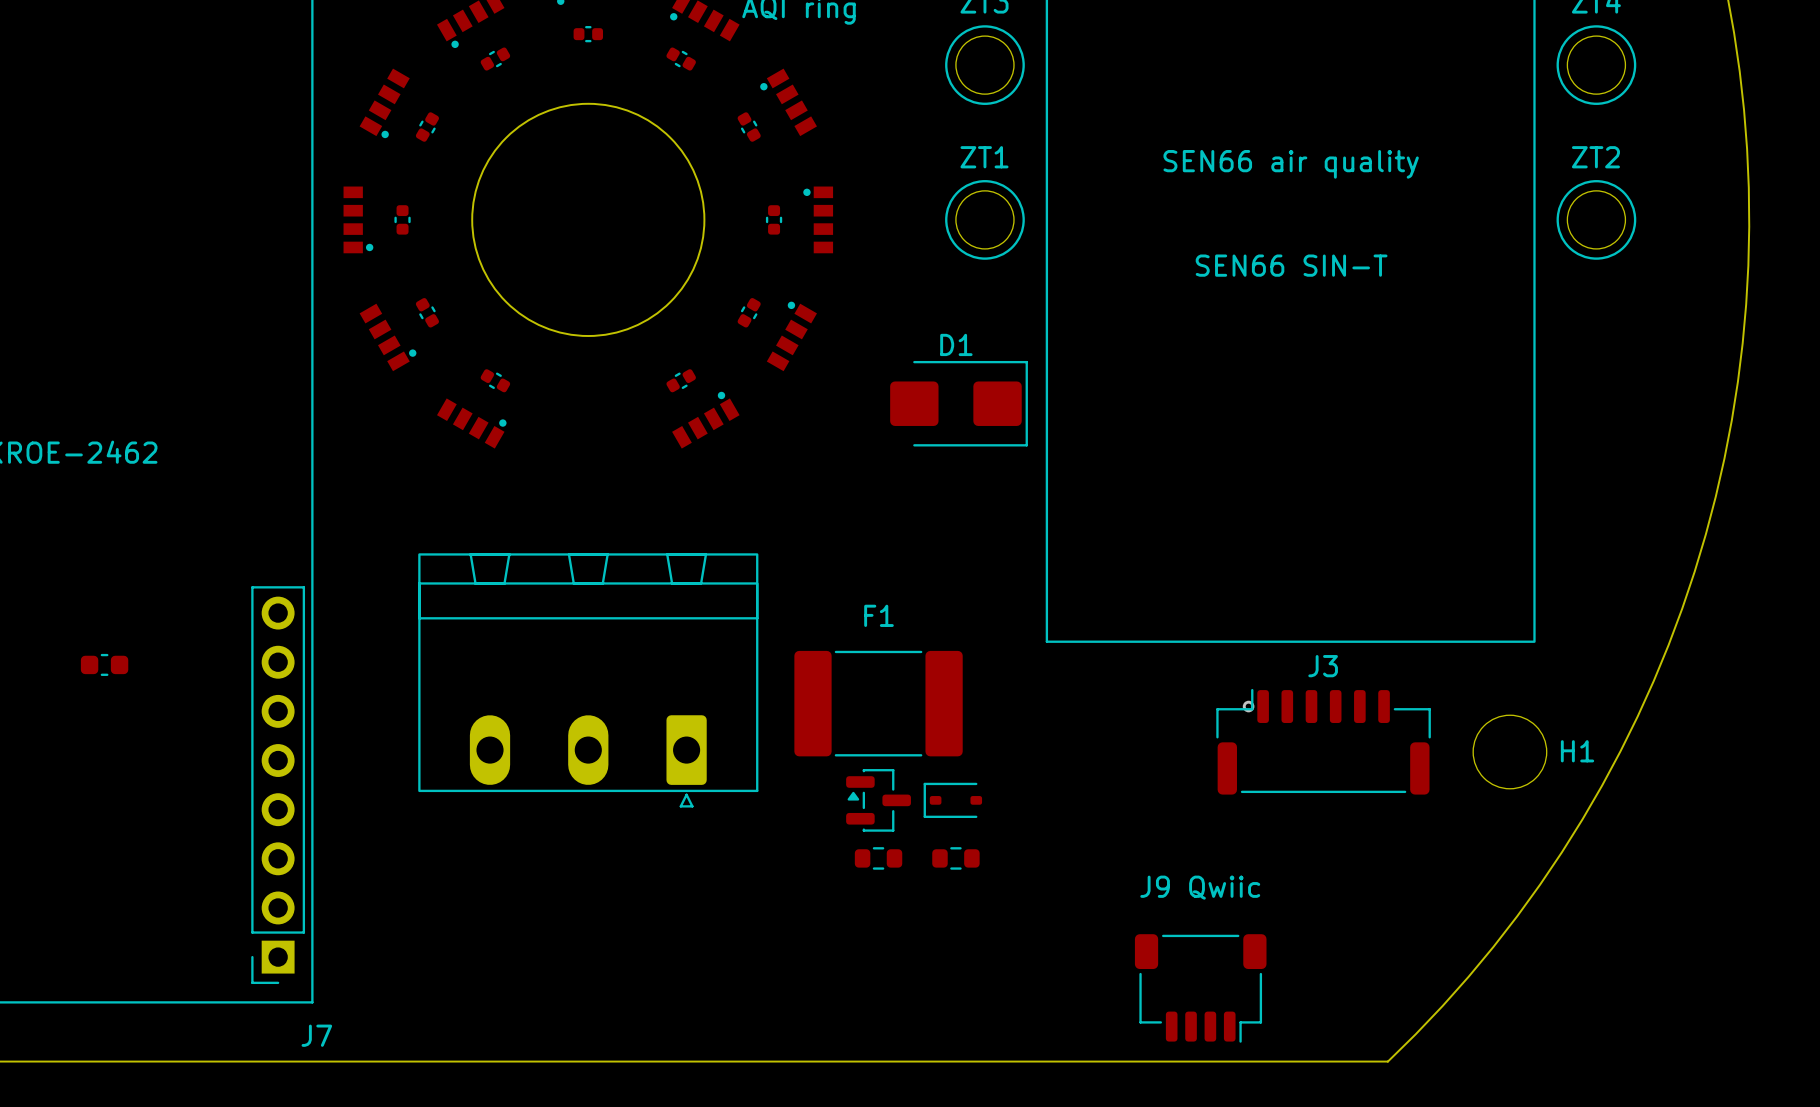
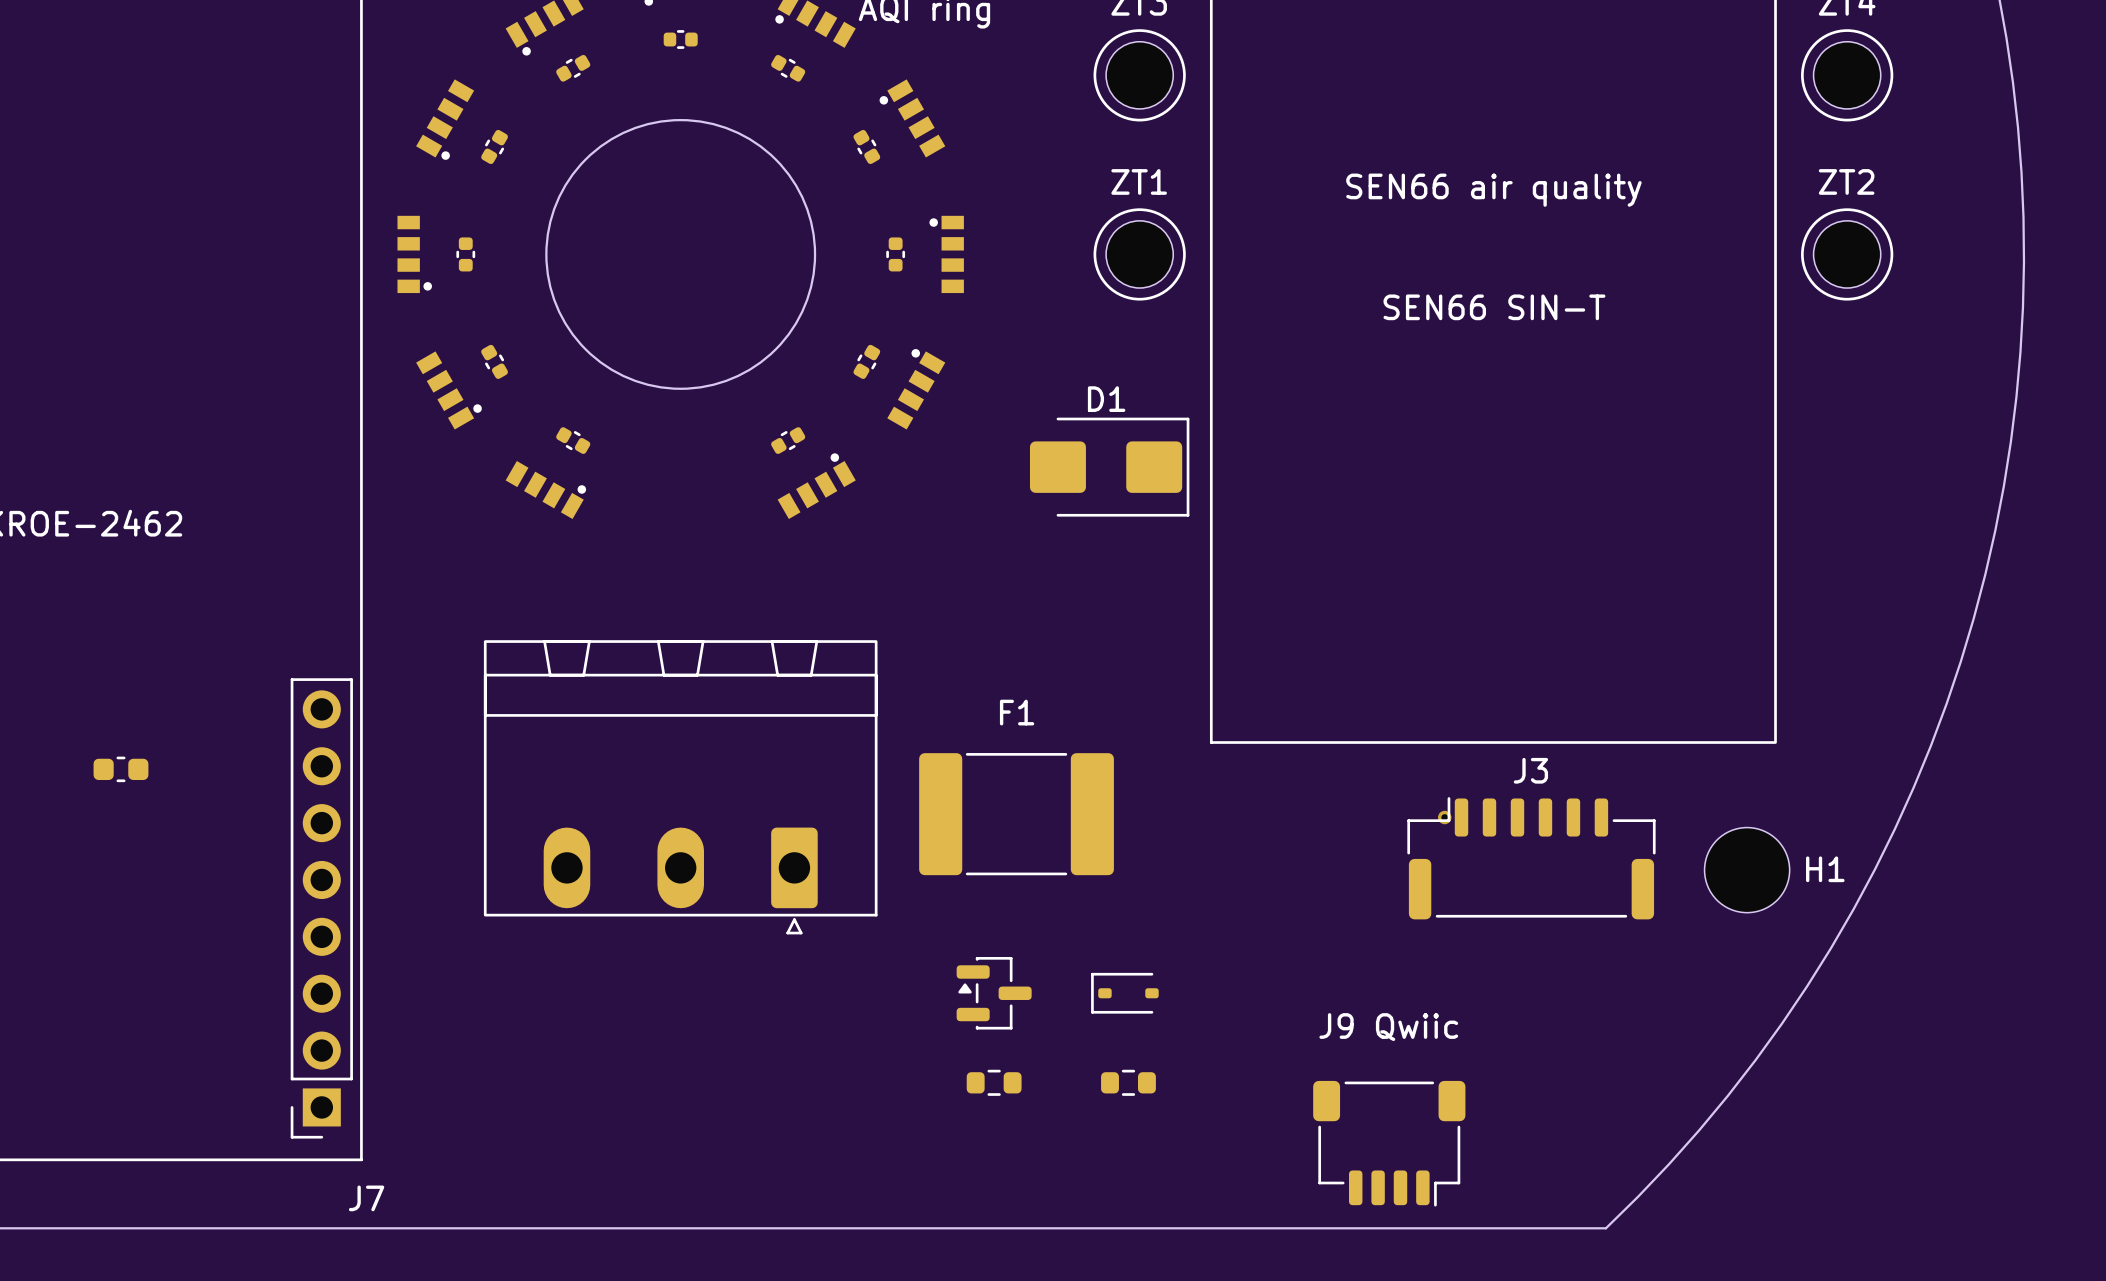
part: (878, 800) -> none
part: (952, 800) -> none
part footprint: [854, 847, 903, 870] -> [956, 956, 1032, 1030]
part footprint: [932, 847, 980, 870] -> [1091, 972, 1159, 1014]
part: none -> (994, 1082)
part: none -> (1128, 1082)

